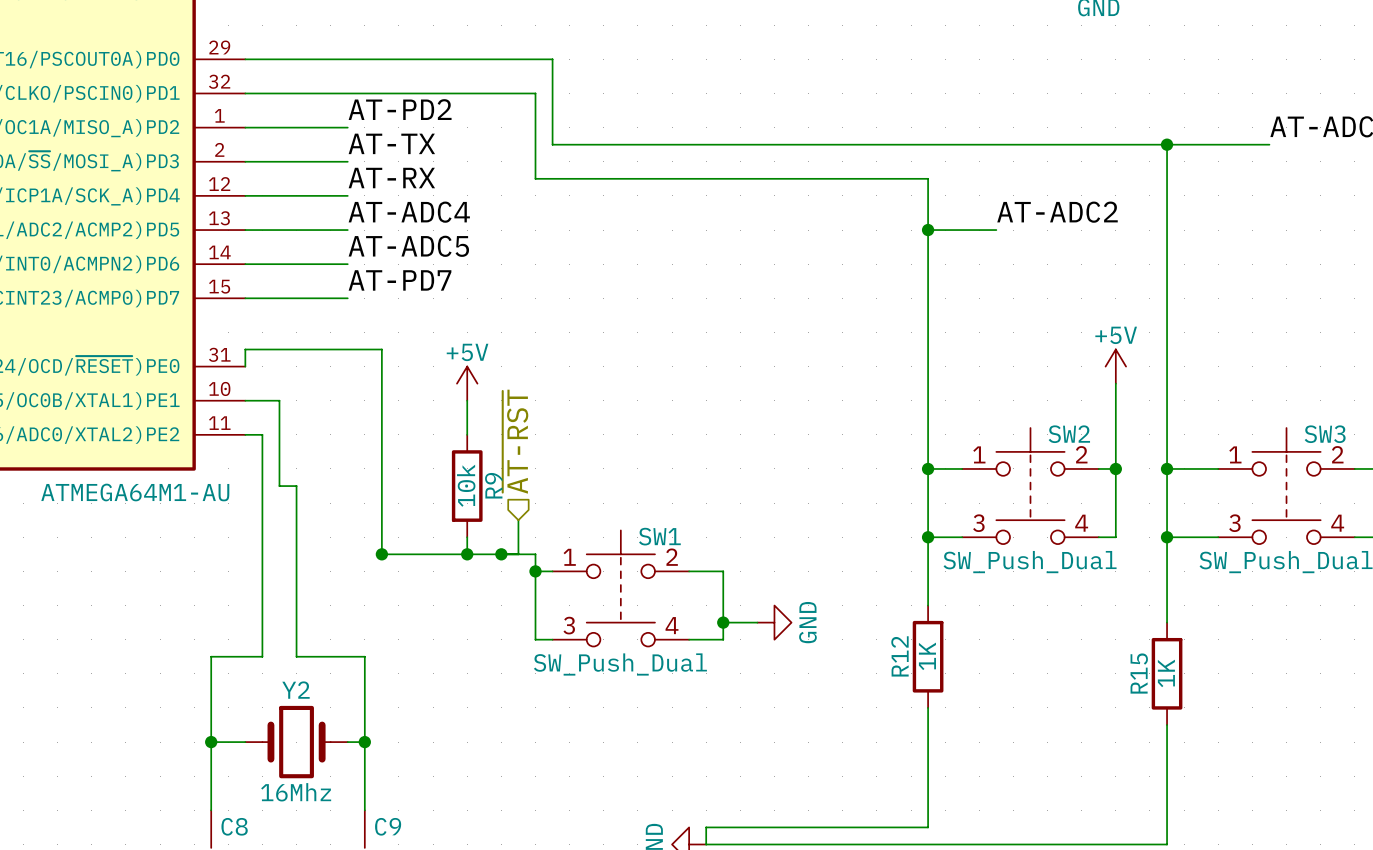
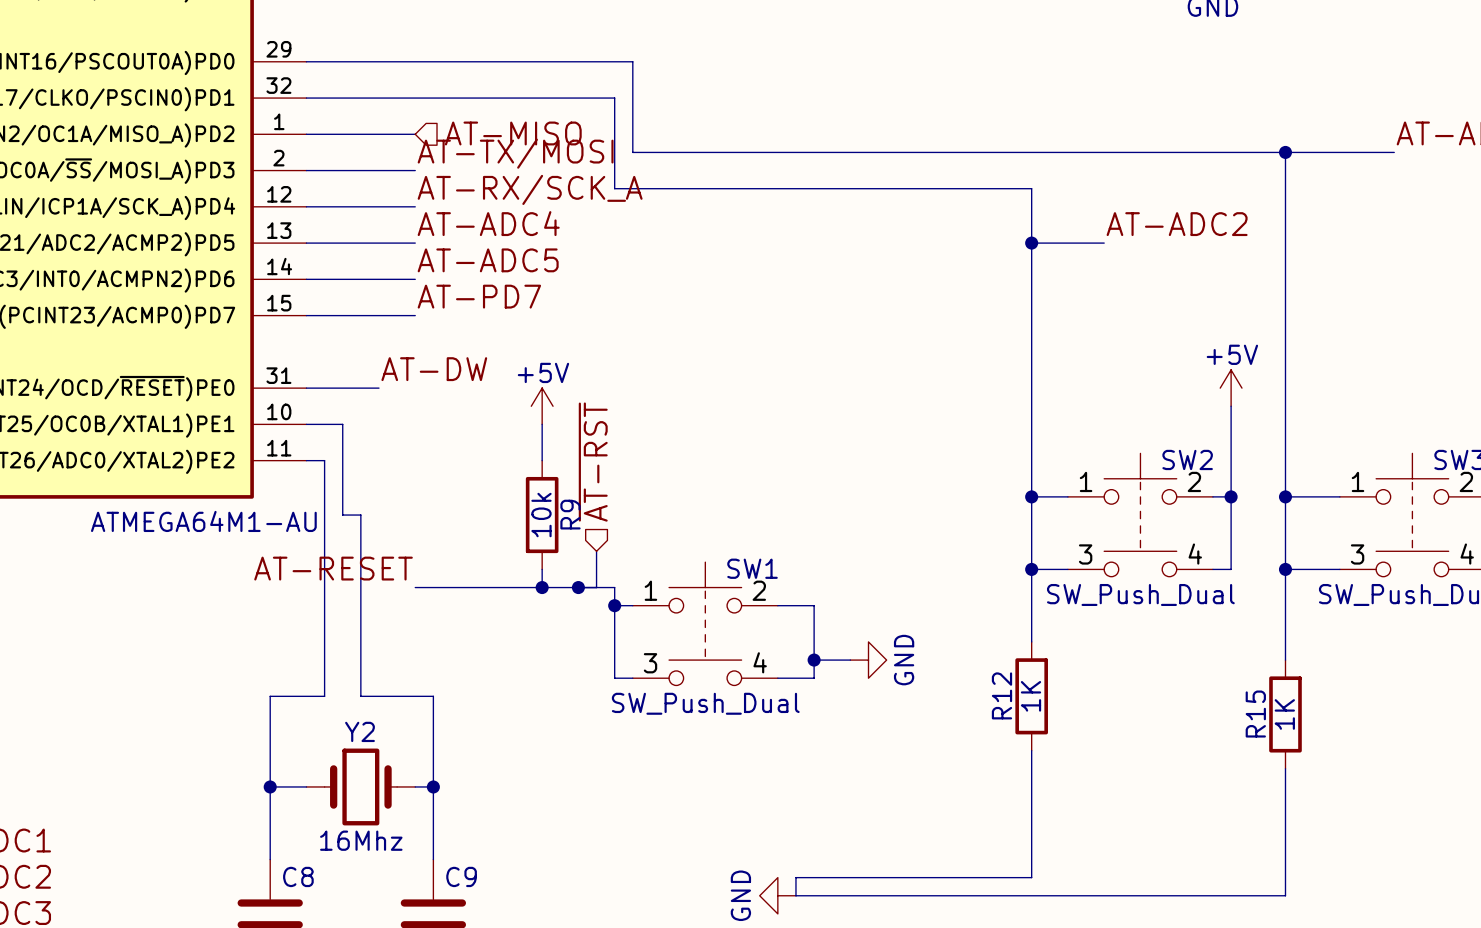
label: AT-PD2 (400, 109) -> none
hierarchical label: none -> AT-MISO (513, 133)
label: AT-TX (391, 143) -> AT-TX/MOSI (515, 153)
label: AT-RX (391, 178) -> AT-RX/SCK_A (530, 189)
label: none -> AT-DW (434, 369)
wire: (245, 366) (245, 349) (381, 349) (381, 554) -> (306, 388) (378, 388)
label: none -> AT-RESET (333, 568)
wire: none -> (415, 587) (451, 587)
junction: (381, 554) -> none

